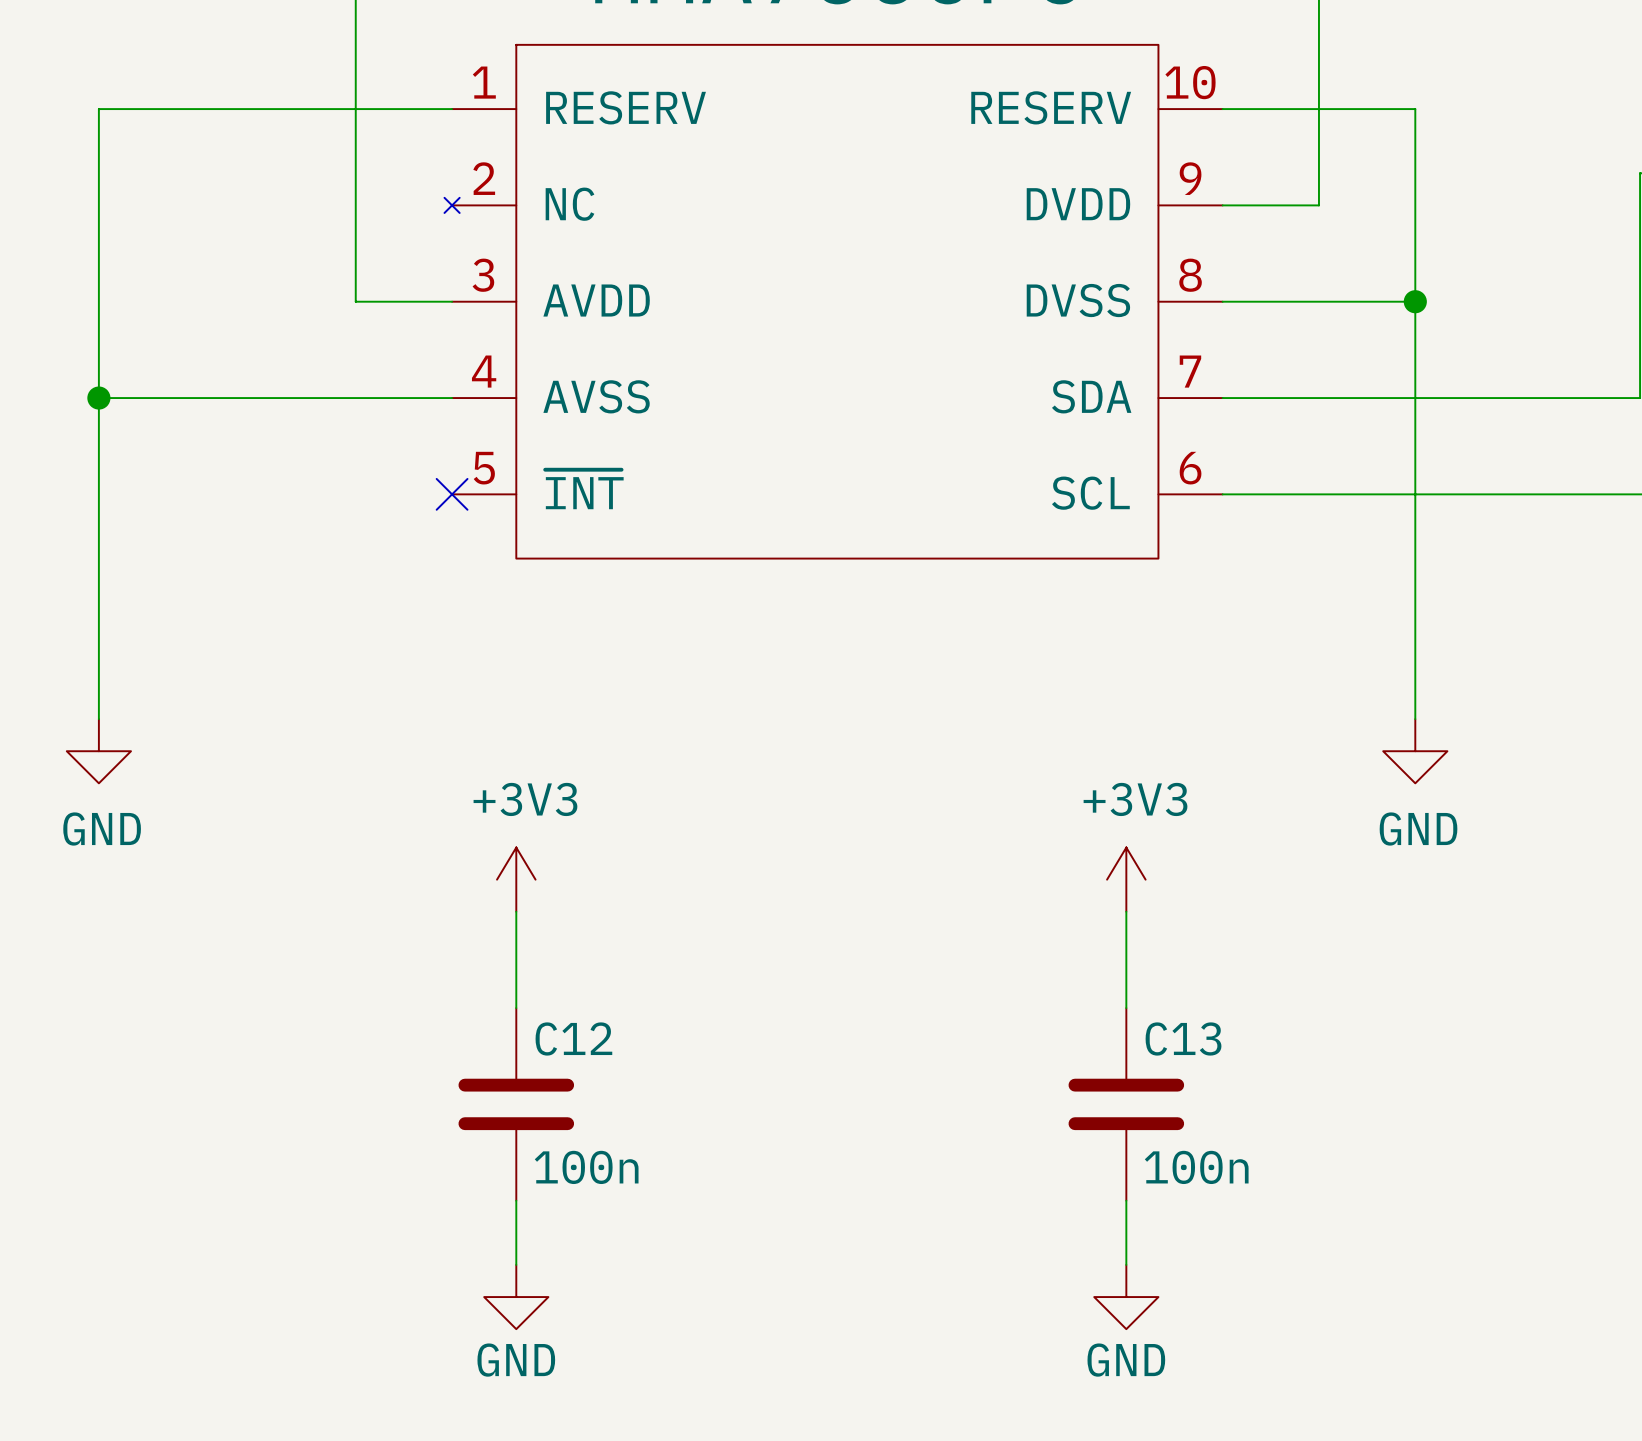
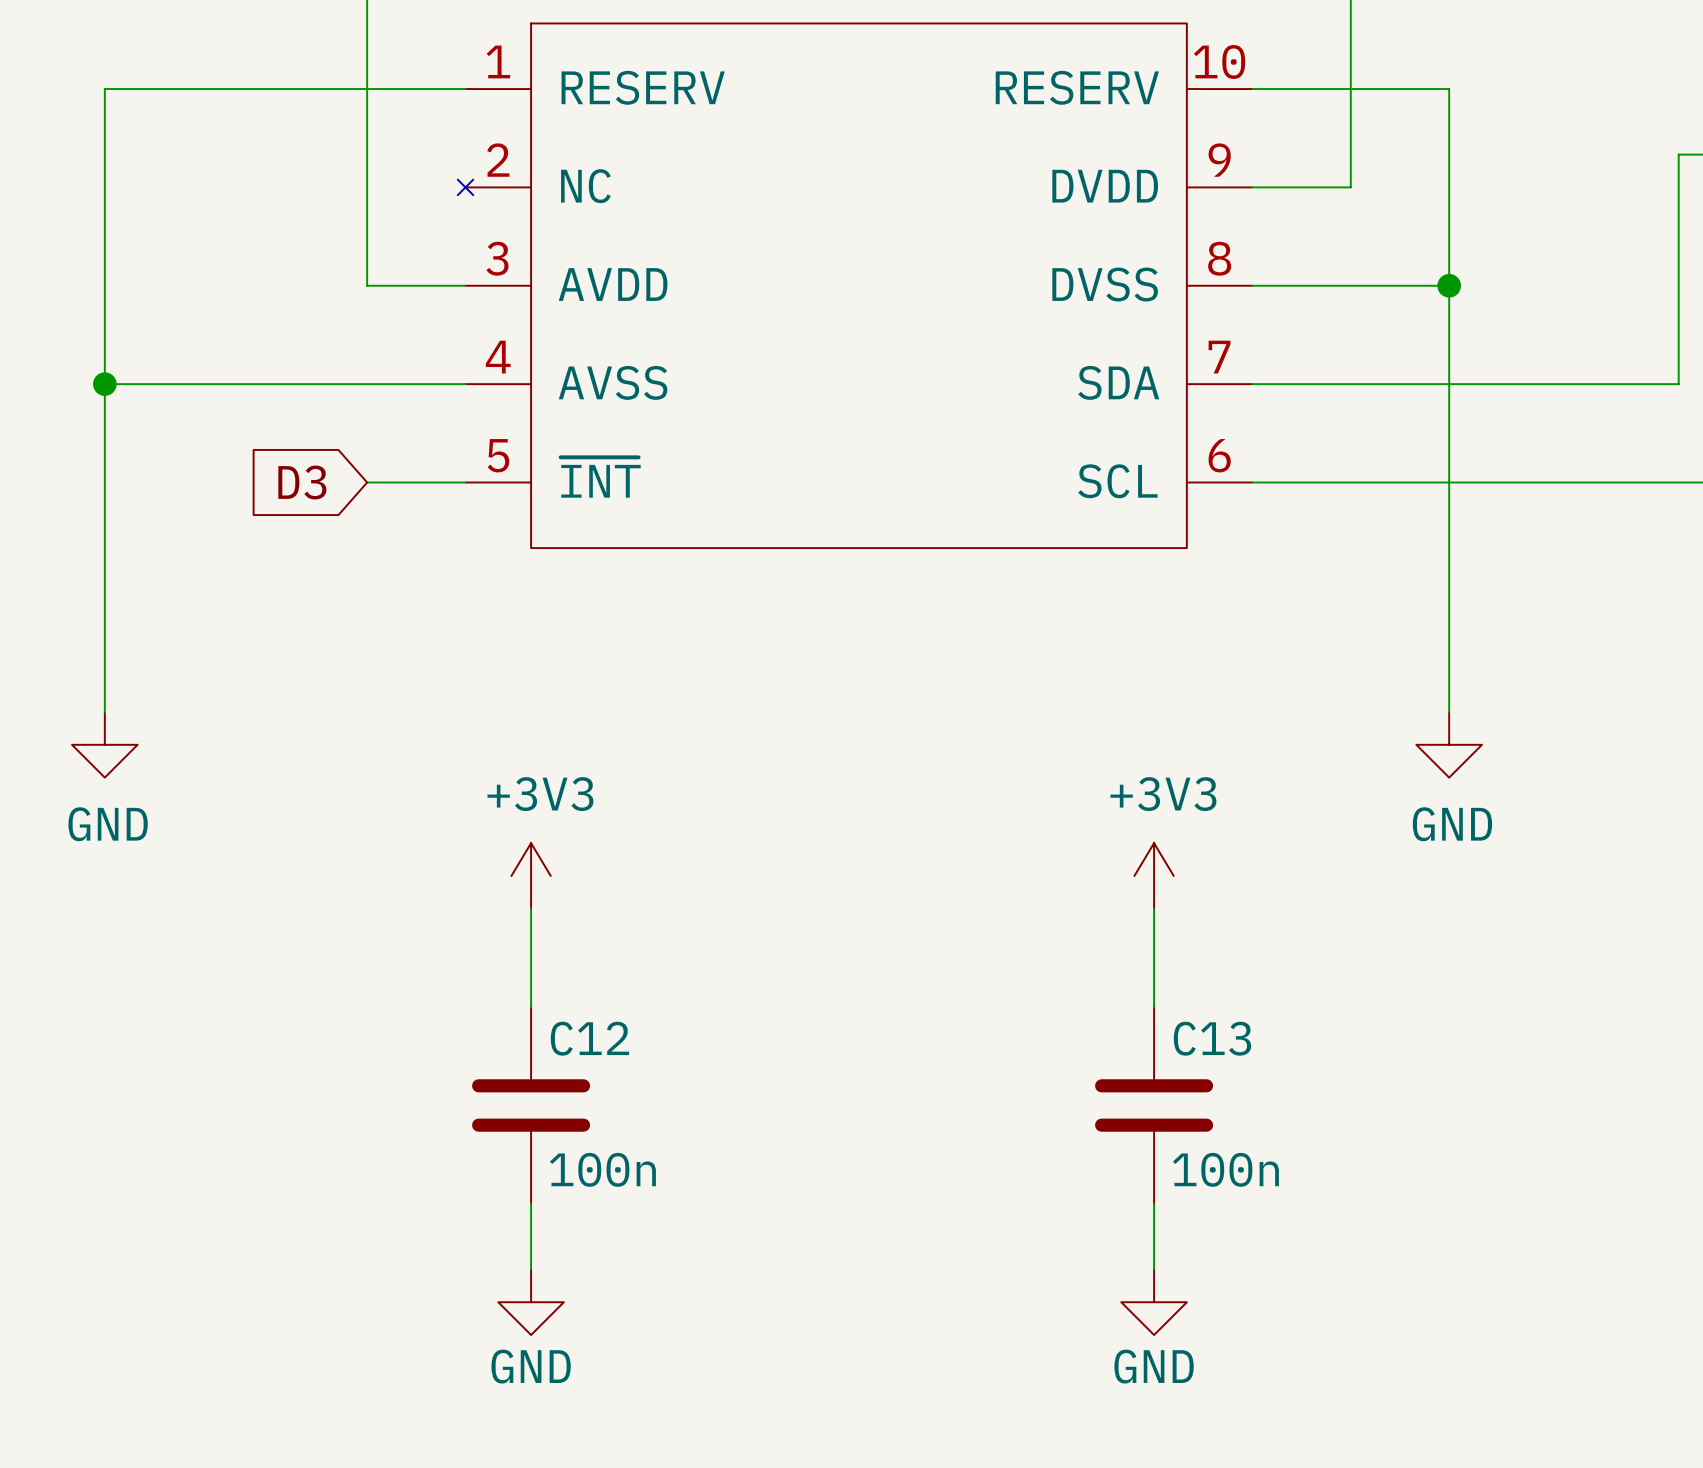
global label: none -> D3 (302, 482)
wire: none -> (367, 482) (465, 482)
no-connect mark: (452, 494) -> none

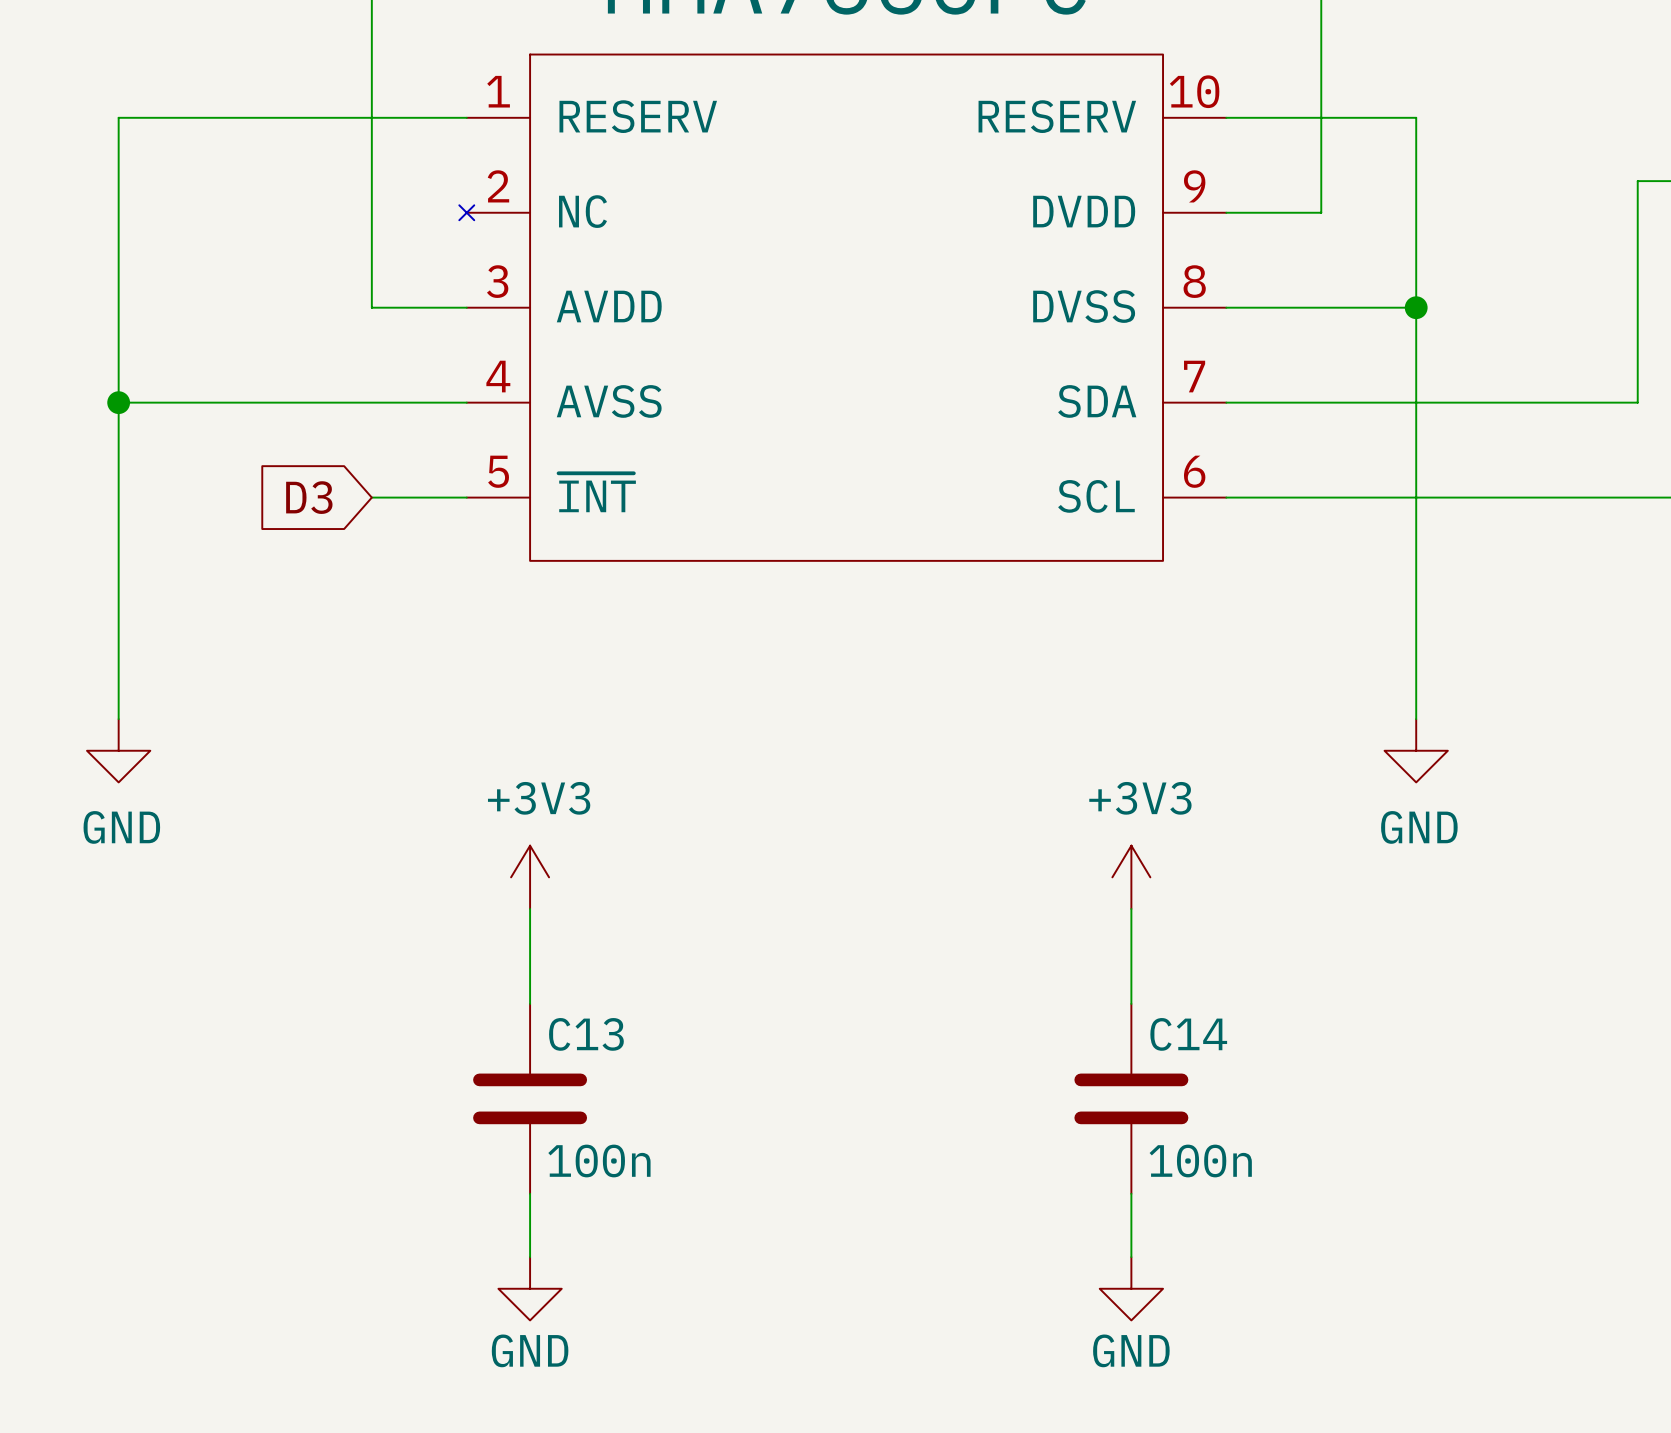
C12 name: C12 (589, 1038) -> C13 (586, 1034)
C13 name: C13 (1212, 1038) -> C14 (1188, 1034)

